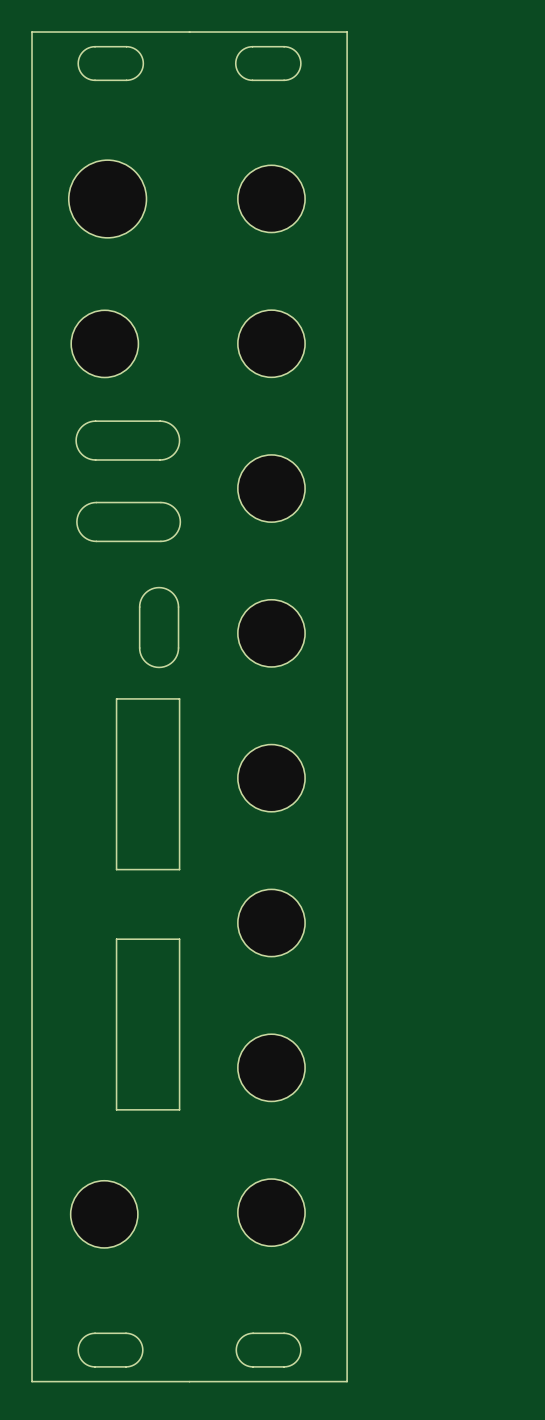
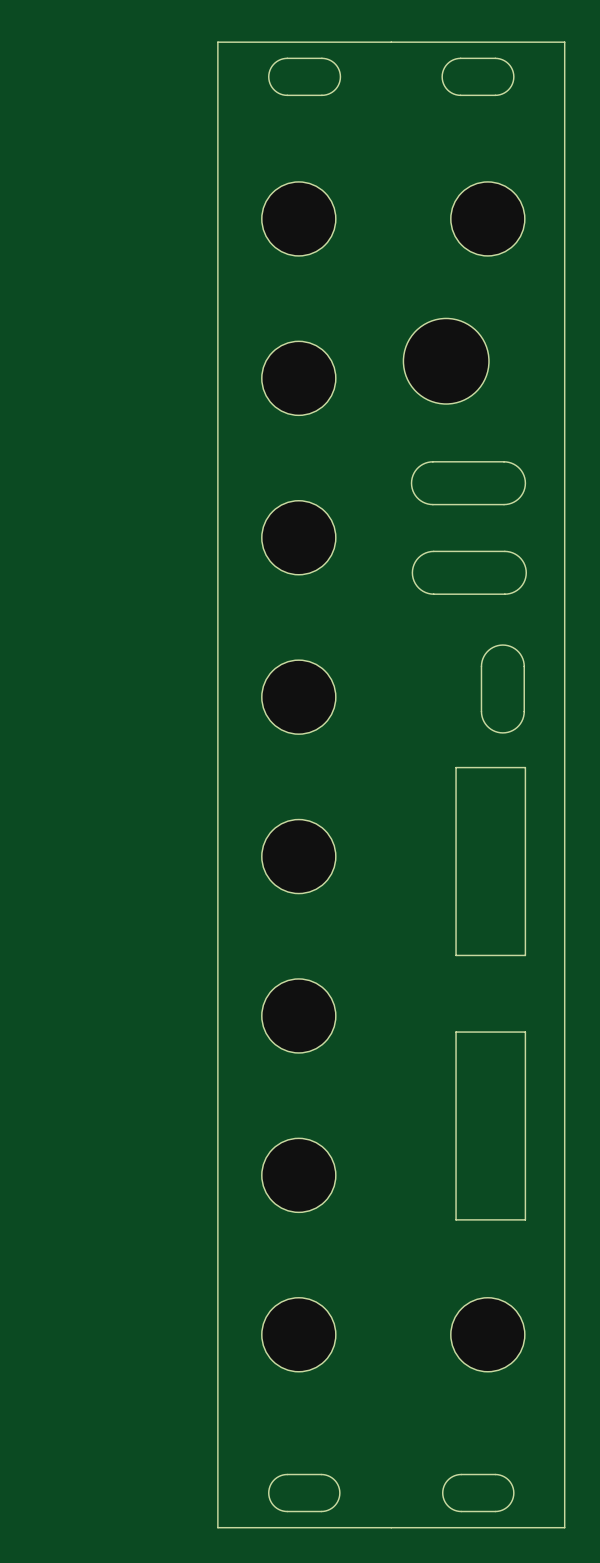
board edge: (347, 32) (347, 1381) (32, 1381) (32, 32) (347, 32) -> (564, 42) (564, 1527) (217, 1527) (217, 42) (564, 42)
board edge: (126, 46) (95, 46) (87, 48) (78, 59) (80, 71) (85, 77) (93, 80) (126, 80) (134, 78) (142, 69) (142, 59) (136, 49) (126, 46) -> (321, 58) (287, 58) (278, 60) (272, 66) (269, 72) (270, 85) (276, 92) (285, 95) (321, 95) (330, 93) (339, 83) (339, 72) (332, 61) (321, 58)
board edge: (284, 46) (252, 46) (244, 48) (236, 59) (238, 71) (242, 76) (250, 80) (284, 80) (292, 78) (299, 69) (300, 59) (294, 50) (284, 46) -> (495, 58) (460, 58) (451, 60) (442, 72) (444, 86) (449, 91) (458, 95) (495, 95) (504, 92) (512, 83) (513, 72) (506, 62) (495, 58)
part: none -> (487, 218)
part: (107, 199) -> none
part: none -> (446, 361)
part: (104, 343) -> none
board edge: none -> (504, 461) (427, 462) (418, 467) (413, 473) (412, 488) (418, 499) (430, 504) (509, 503) (521, 495) (525, 480) (518, 467) (504, 461)
board edge: (160, 421) (90, 421) (78, 430) (76, 445) (83, 455) (93, 459) (164, 459) (176, 451) (179, 438) (173, 426) (160, 421) -> none
board edge: none -> (504, 551) (428, 552) (420, 555) (415, 562) (412, 570) (413, 578) (420, 589) (430, 594) (509, 593) (522, 584) (526, 570) (519, 556) (504, 551)
board edge: (160, 502) (91, 503) (79, 512) (77, 526) (84, 537) (93, 541) (165, 540) (176, 533) (180, 519) (172, 506) (160, 502) -> none
board edge: none -> (524, 666) (524, 711) (521, 721) (510, 731) (502, 732) (492, 730) (485, 723) (481, 714) (481, 666) (483, 656) (495, 646) (507, 645) (518, 652) (524, 666)
board edge: (178, 607) (177, 655) (166, 665) (151, 665) (143, 659) (139, 650) (139, 607) (141, 598) (152, 588) (163, 588) (173, 594) (178, 607) -> none
board edge: none -> (525, 767) (456, 767) (456, 955) (525, 955) (525, 767)
board edge: (179, 698) (116, 698) (116, 869) (179, 869) (179, 698) -> none
board edge: none -> (525, 1032) (525, 1219) (456, 1219) (456, 1032) (525, 1032)
board edge: (179, 939) (179, 1109) (116, 1109) (116, 939) (179, 939) -> none
part: none -> (487, 1334)
part: (104, 1214) -> none
board edge: (126, 1333) (95, 1333) (87, 1335) (78, 1346) (80, 1357) (85, 1363) (93, 1366) (126, 1366) (133, 1364) (141, 1356) (142, 1346) (135, 1336) (126, 1333) -> (321, 1474) (287, 1474) (278, 1476) (272, 1482) (269, 1488) (270, 1501) (276, 1508) (285, 1511) (321, 1511) (329, 1509) (338, 1499) (339, 1488) (331, 1477) (321, 1474)
board edge: (284, 1333) (253, 1333) (245, 1335) (236, 1346) (238, 1357) (243, 1363) (251, 1366) (284, 1366) (292, 1364) (299, 1356) (300, 1345) (294, 1336) (284, 1333) -> (495, 1474) (461, 1474) (452, 1476) (446, 1482) (443, 1488) (444, 1501) (450, 1508) (459, 1511) (495, 1511) (504, 1509) (512, 1500) (513, 1488) (506, 1478) (495, 1474)

